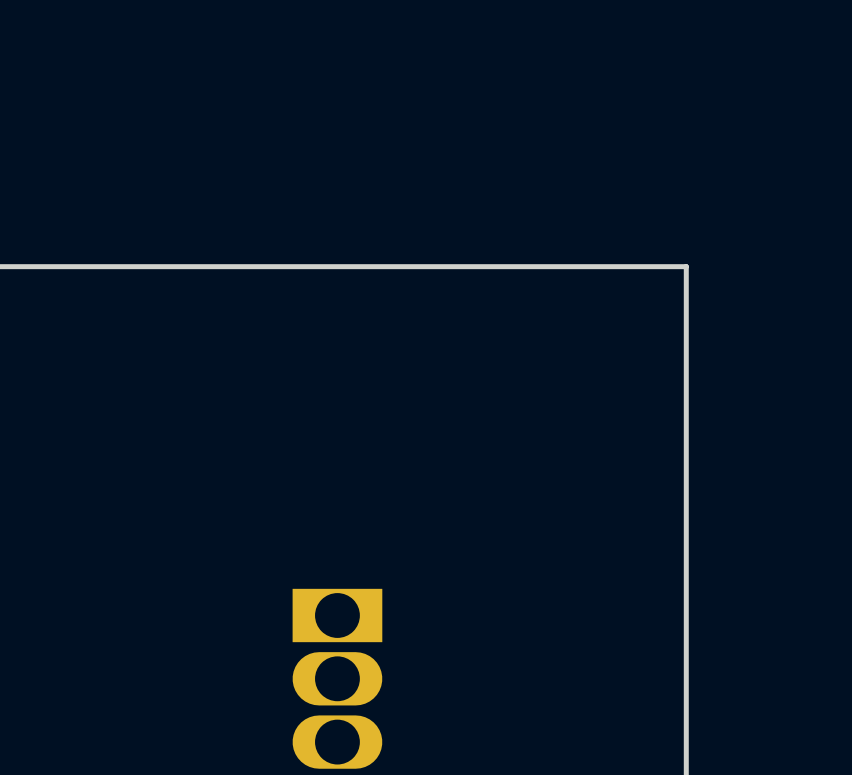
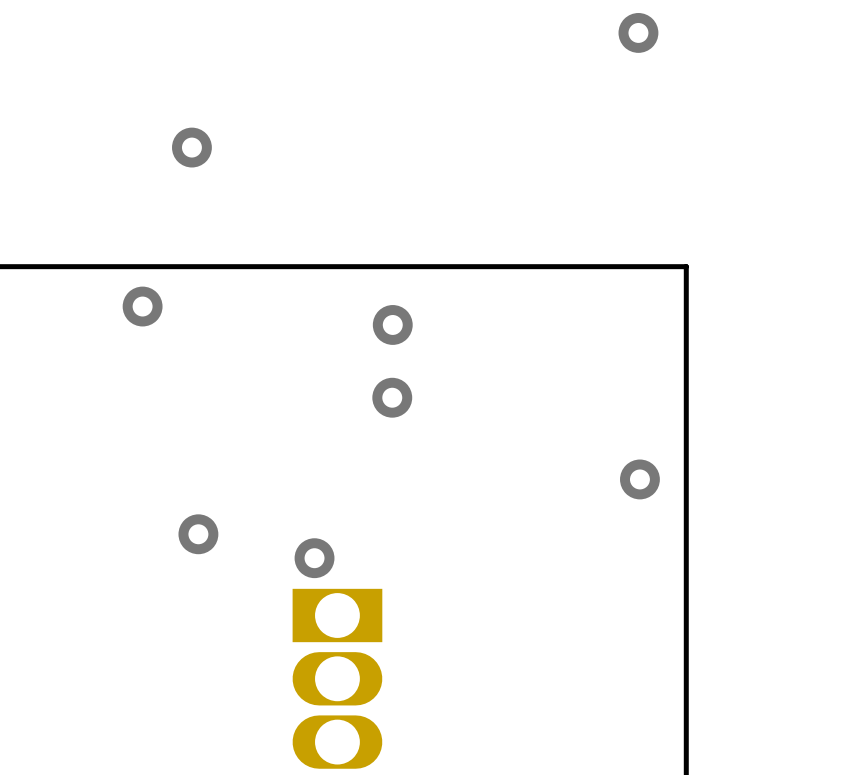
via: none -> (638, 32)
via: none -> (191, 147)
via: none -> (142, 306)
via: none -> (392, 324)
via: none -> (392, 397)
via: none -> (639, 479)
via: none -> (198, 534)
via: none -> (314, 558)

